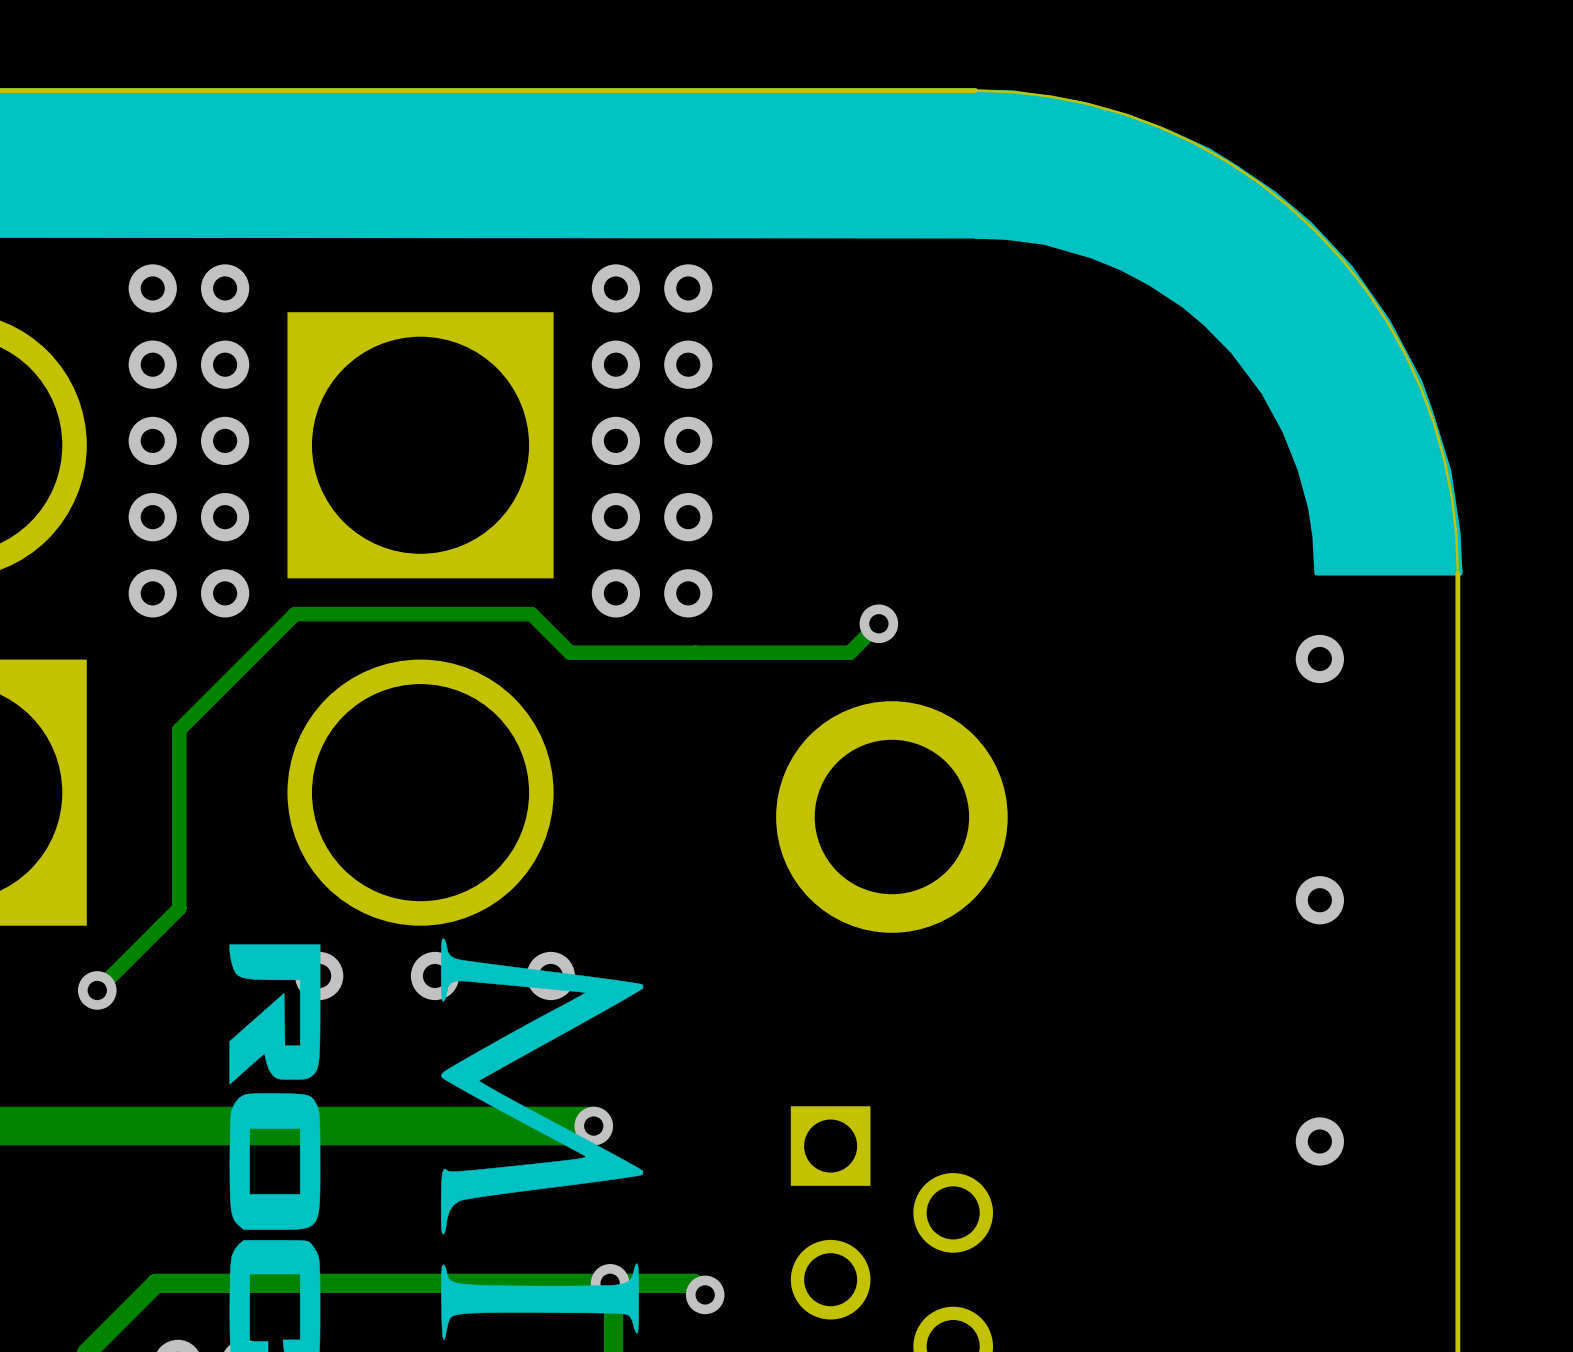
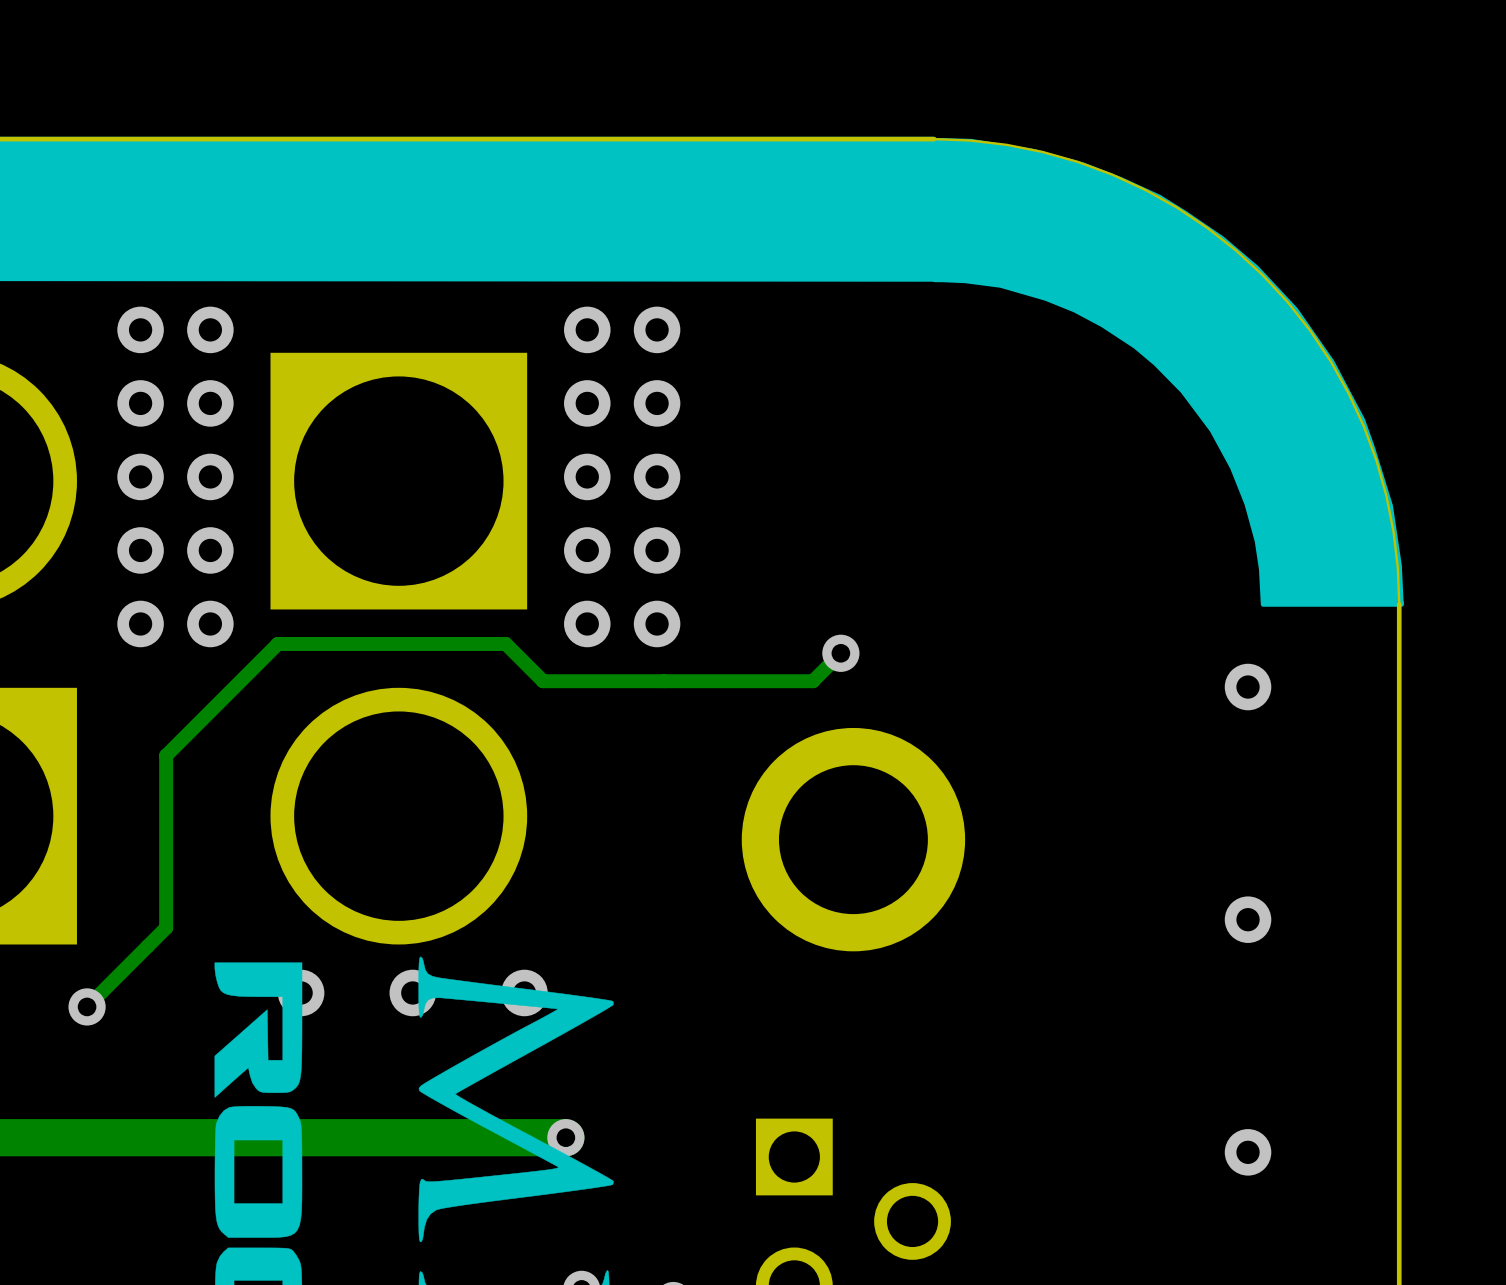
via position: (1319, 658) -> (1248, 687)
via position: (1319, 900) -> (1248, 919)
via position: (1319, 1141) -> (1248, 1152)

